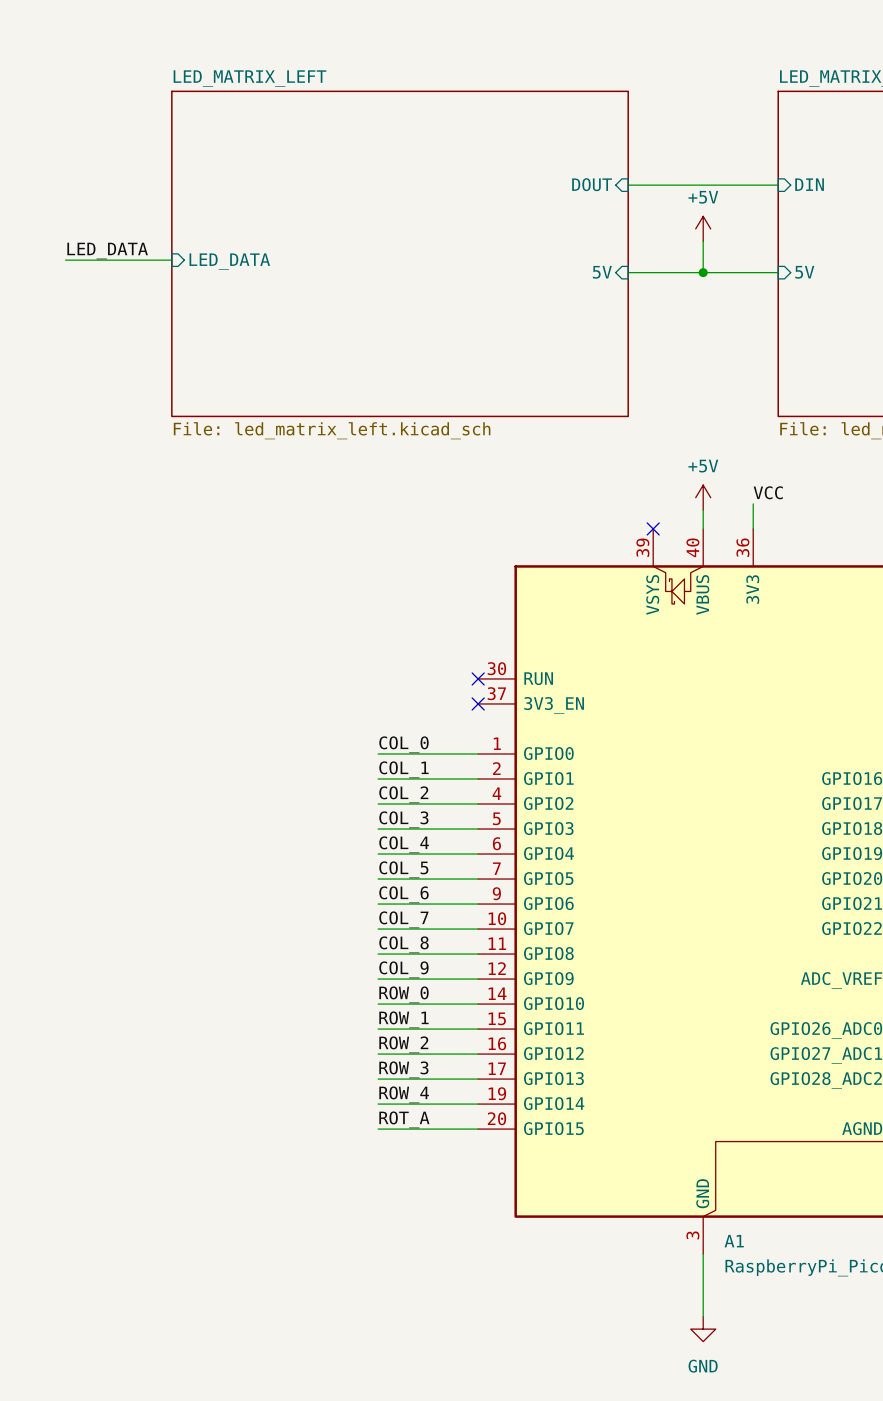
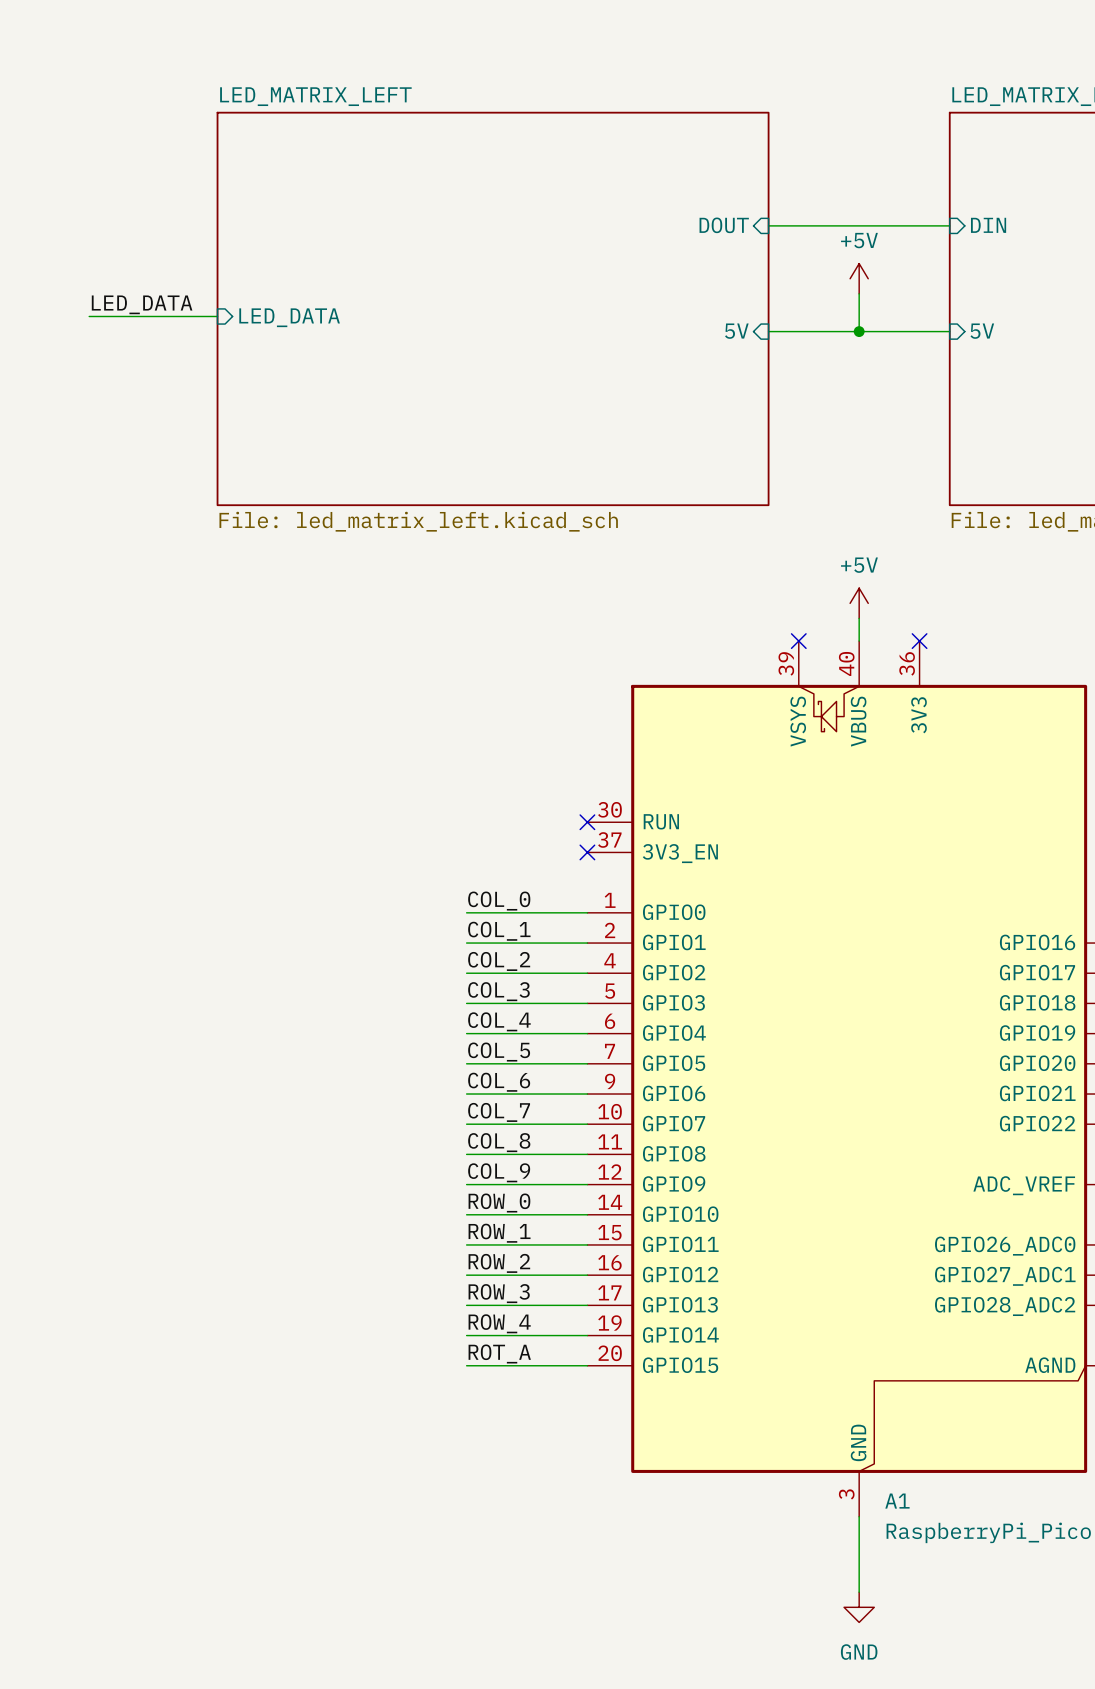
label: VCC (768, 492) -> none
wire: (753, 503) (753, 528) -> none
no-connect mark: none -> (919, 641)

